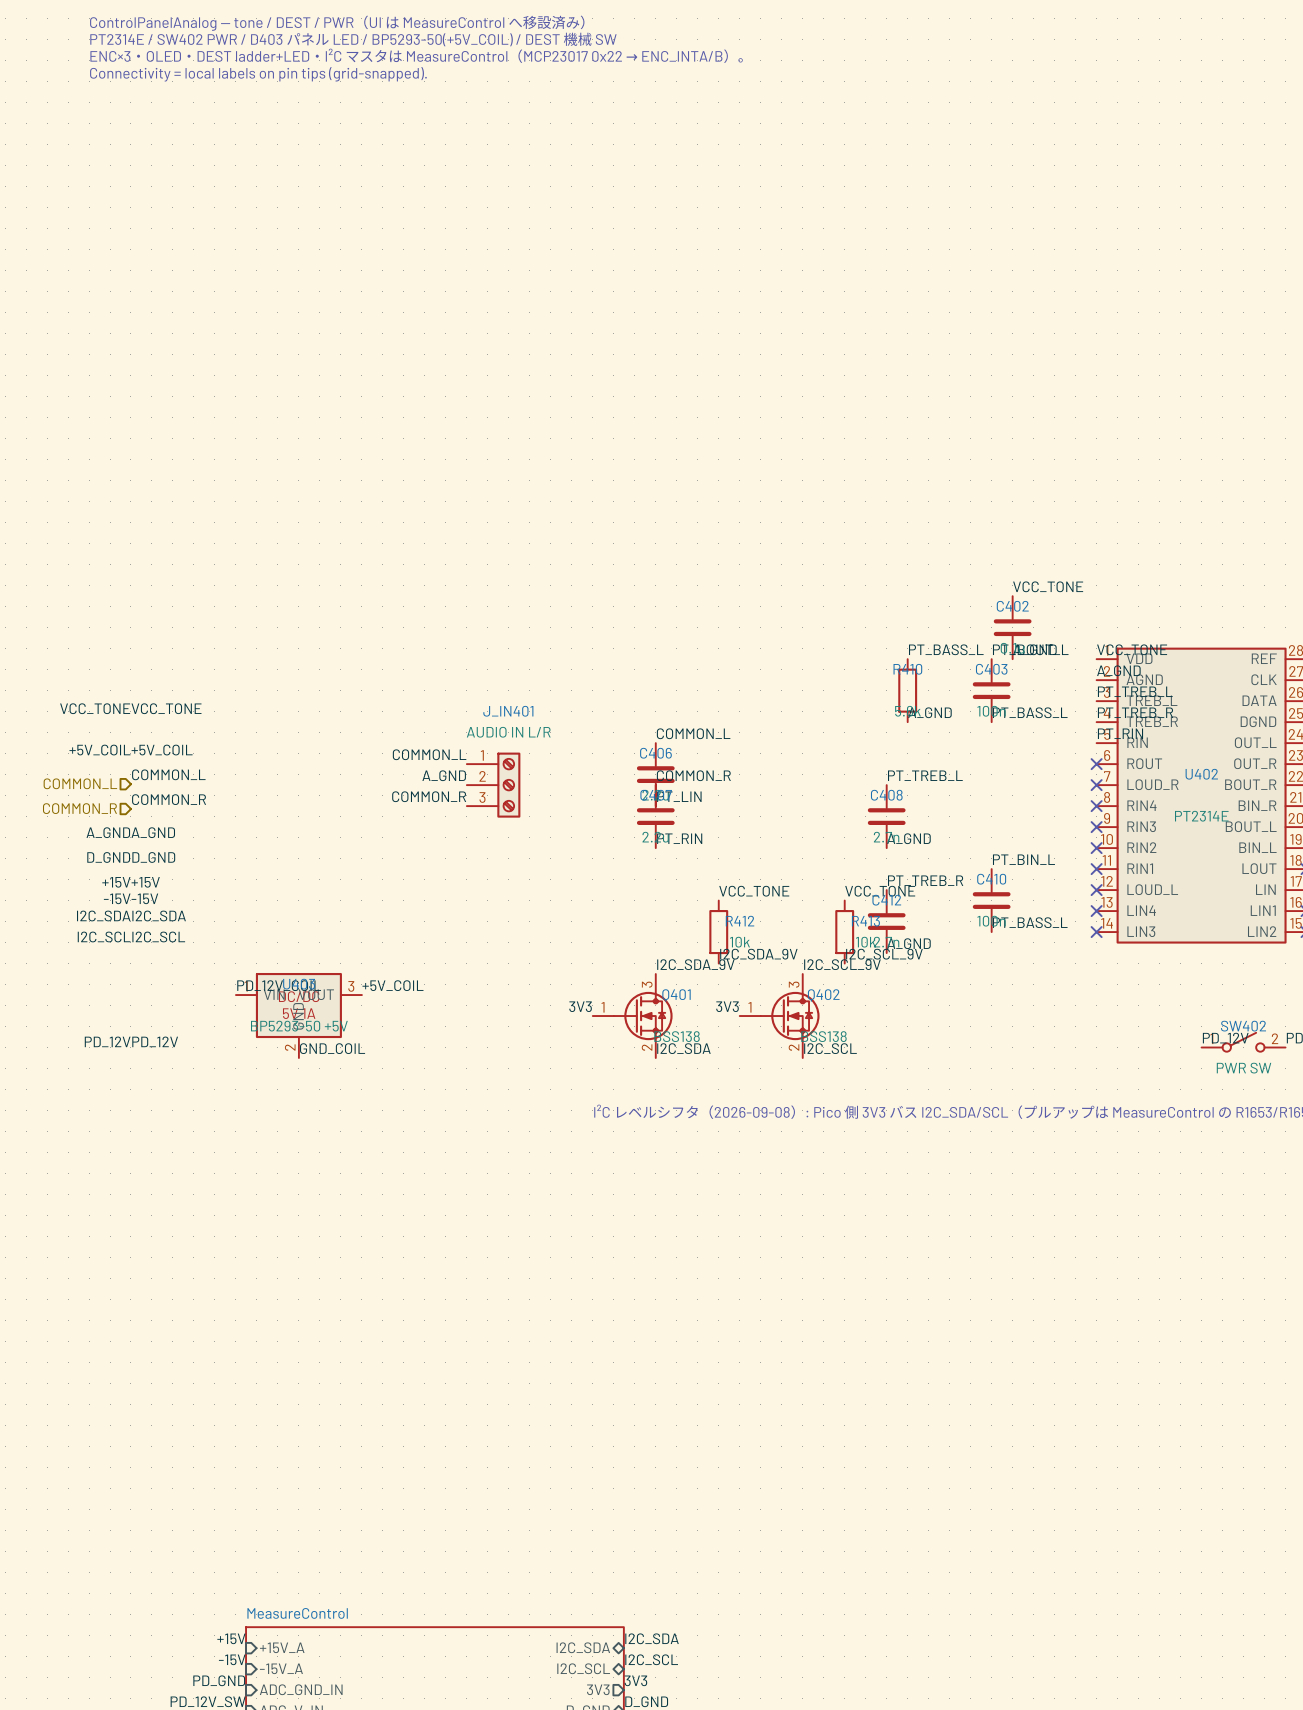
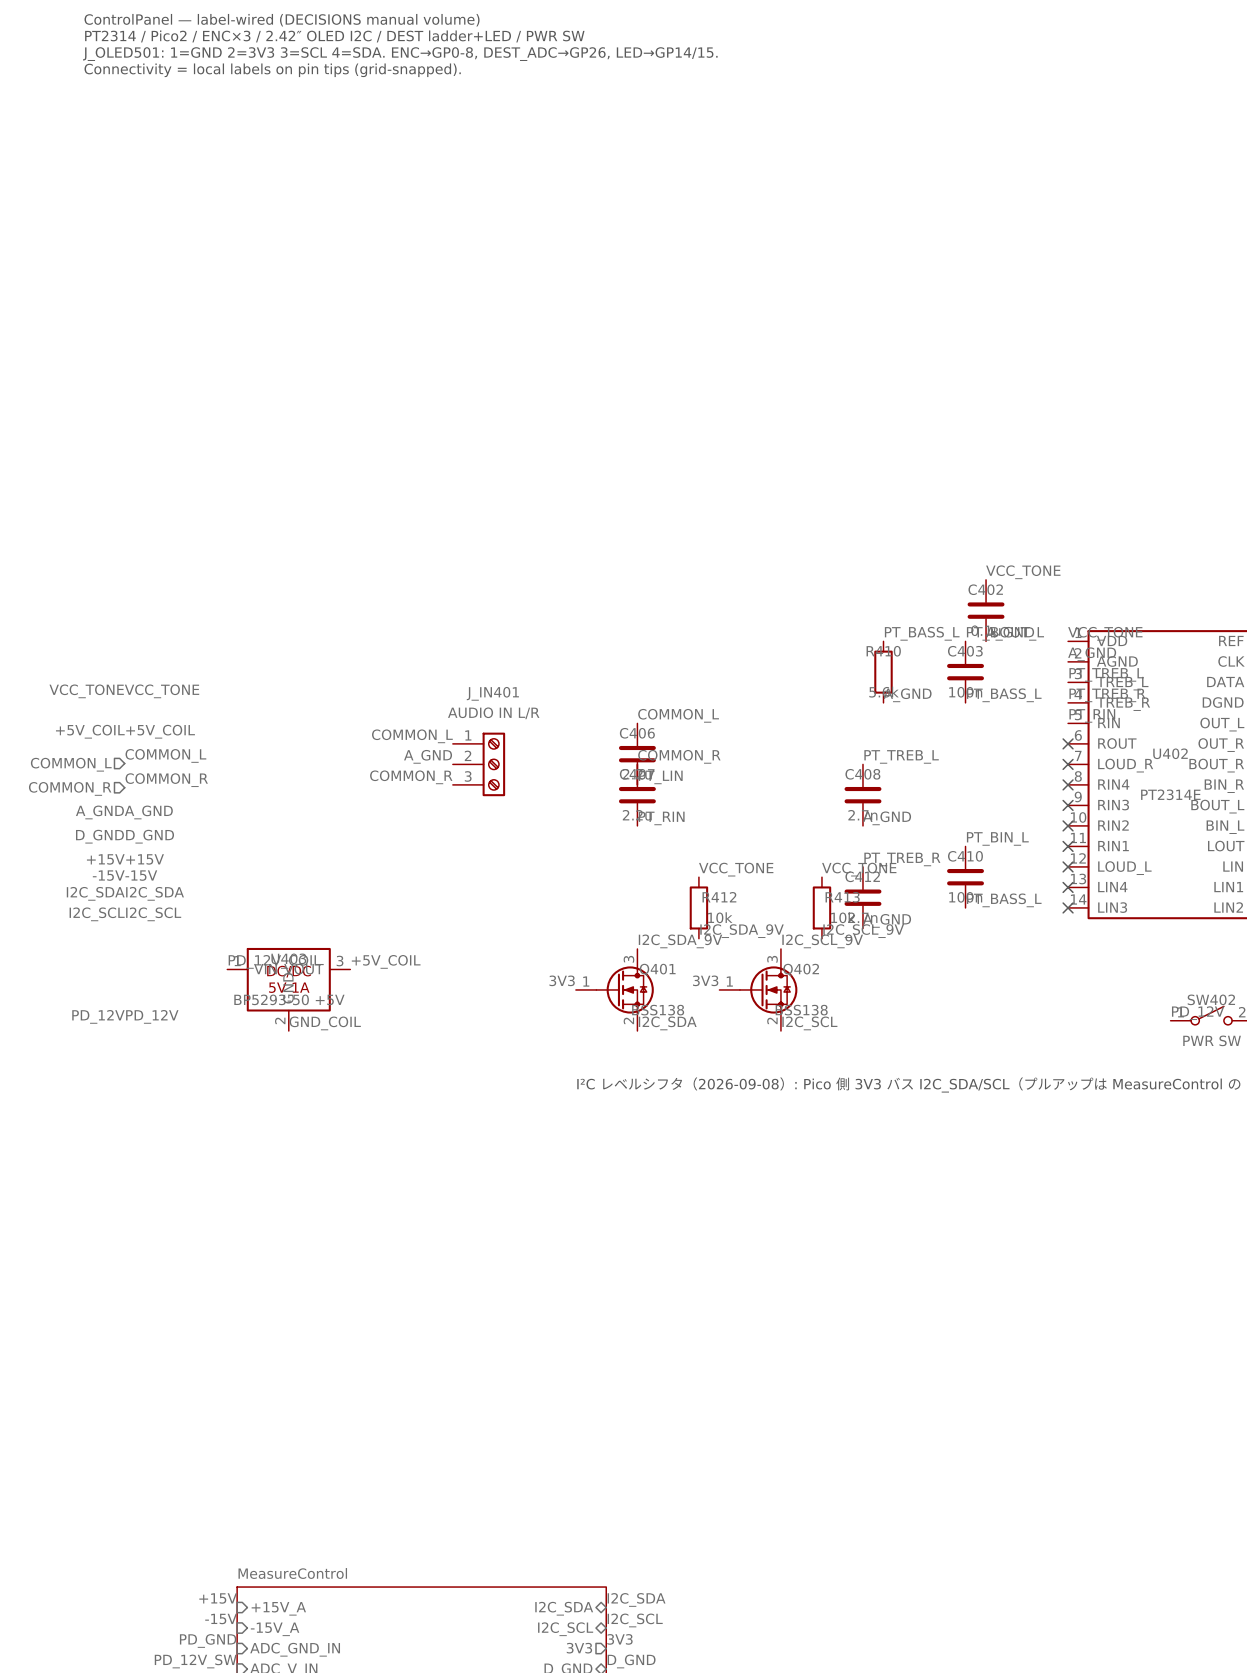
text: ControlPanelAnalog — tone / DEST / PWR（UI は MeasureControl へ移設済み） (337, 23) -> ControlPanel — label-wired (DECISIONS manual volume) (282, 20)
text: PT2314E / SW402 PWR / D403 パネル LED / BP5293-50(+5V_COIL) / DEST 機械 SW (353, 39) -> PT2314 / Pico2 / ENC×3 / 2.42″ OLED I2C / DEST ladder+LED / PWR SW (334, 36)
text: ENC×3・OLED・DEST ladder+LED・I²C マスタは MeasureControl（MCP23017 0x22 → ENC_INTA/B）。 (416, 55) -> J_OLED501: 1=GND 2=3V3 3=SCL 4=SDA. ENC→GP0-8, DEST_ADC→GP26, LED→GP14/15. (400, 54)

